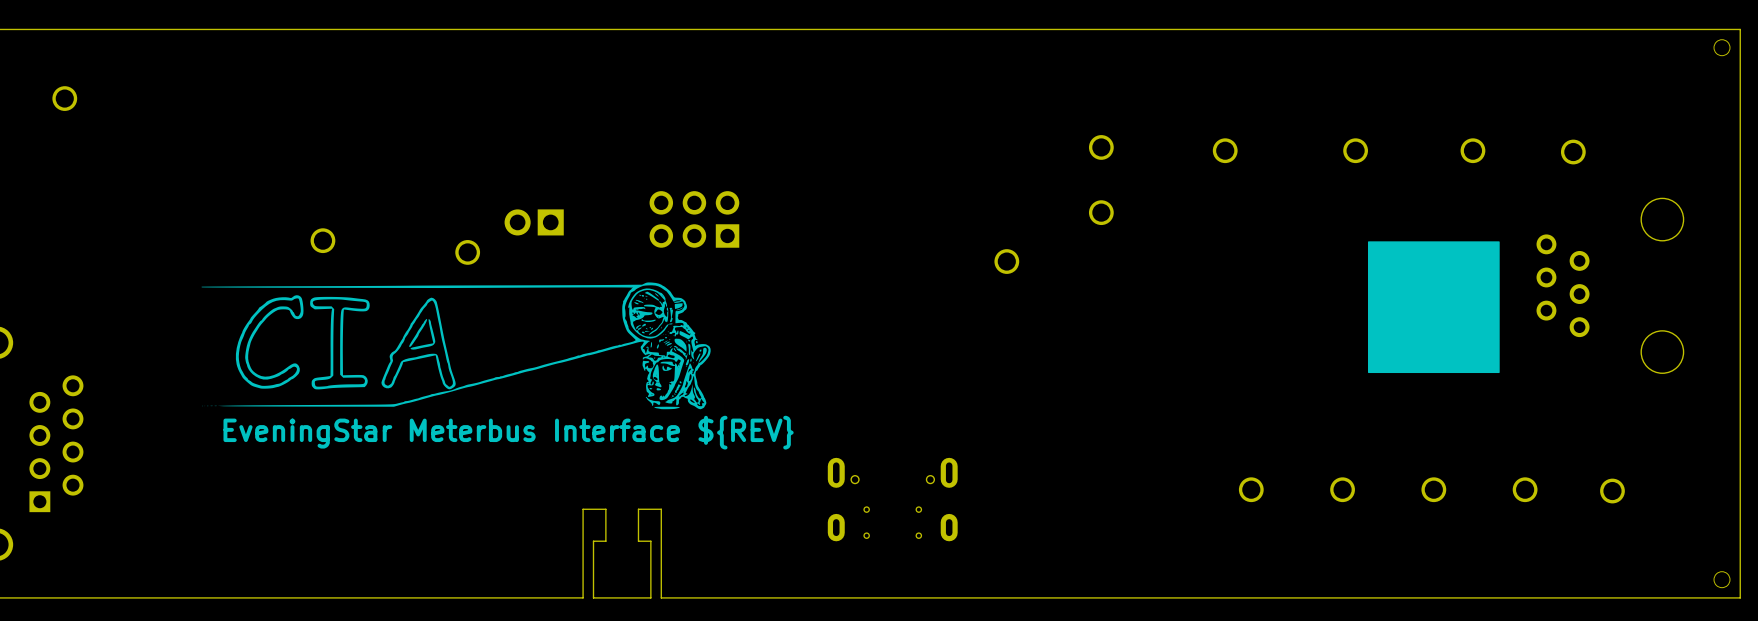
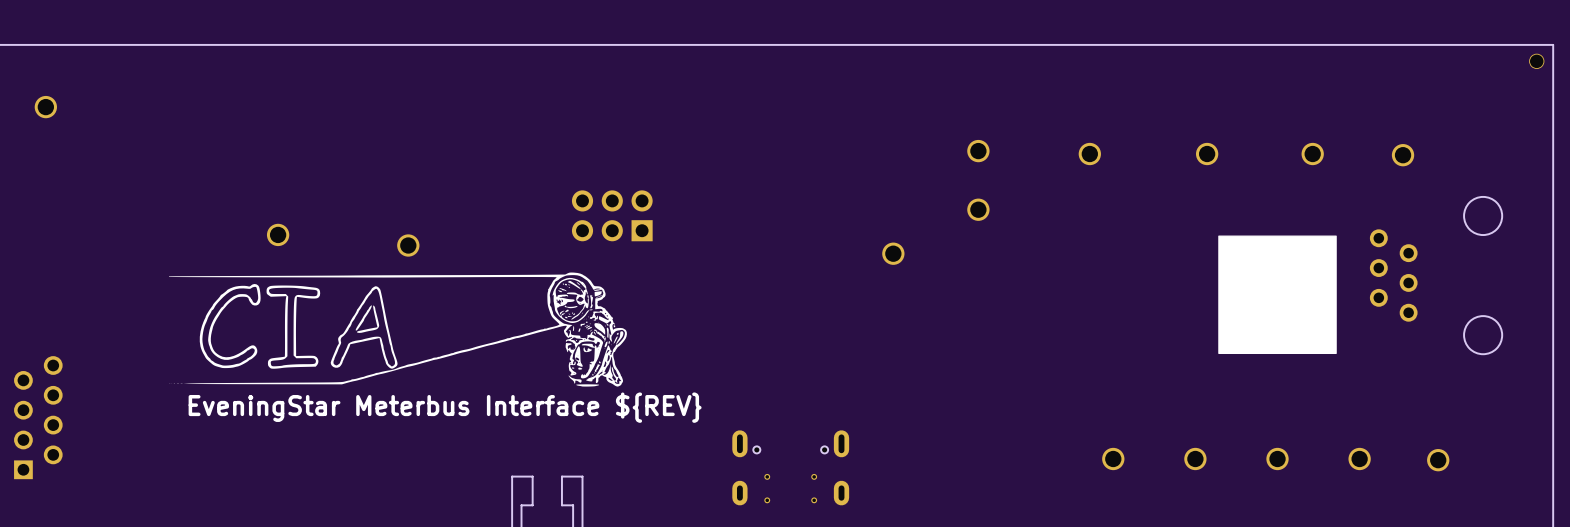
part: (534, 222) -> none

